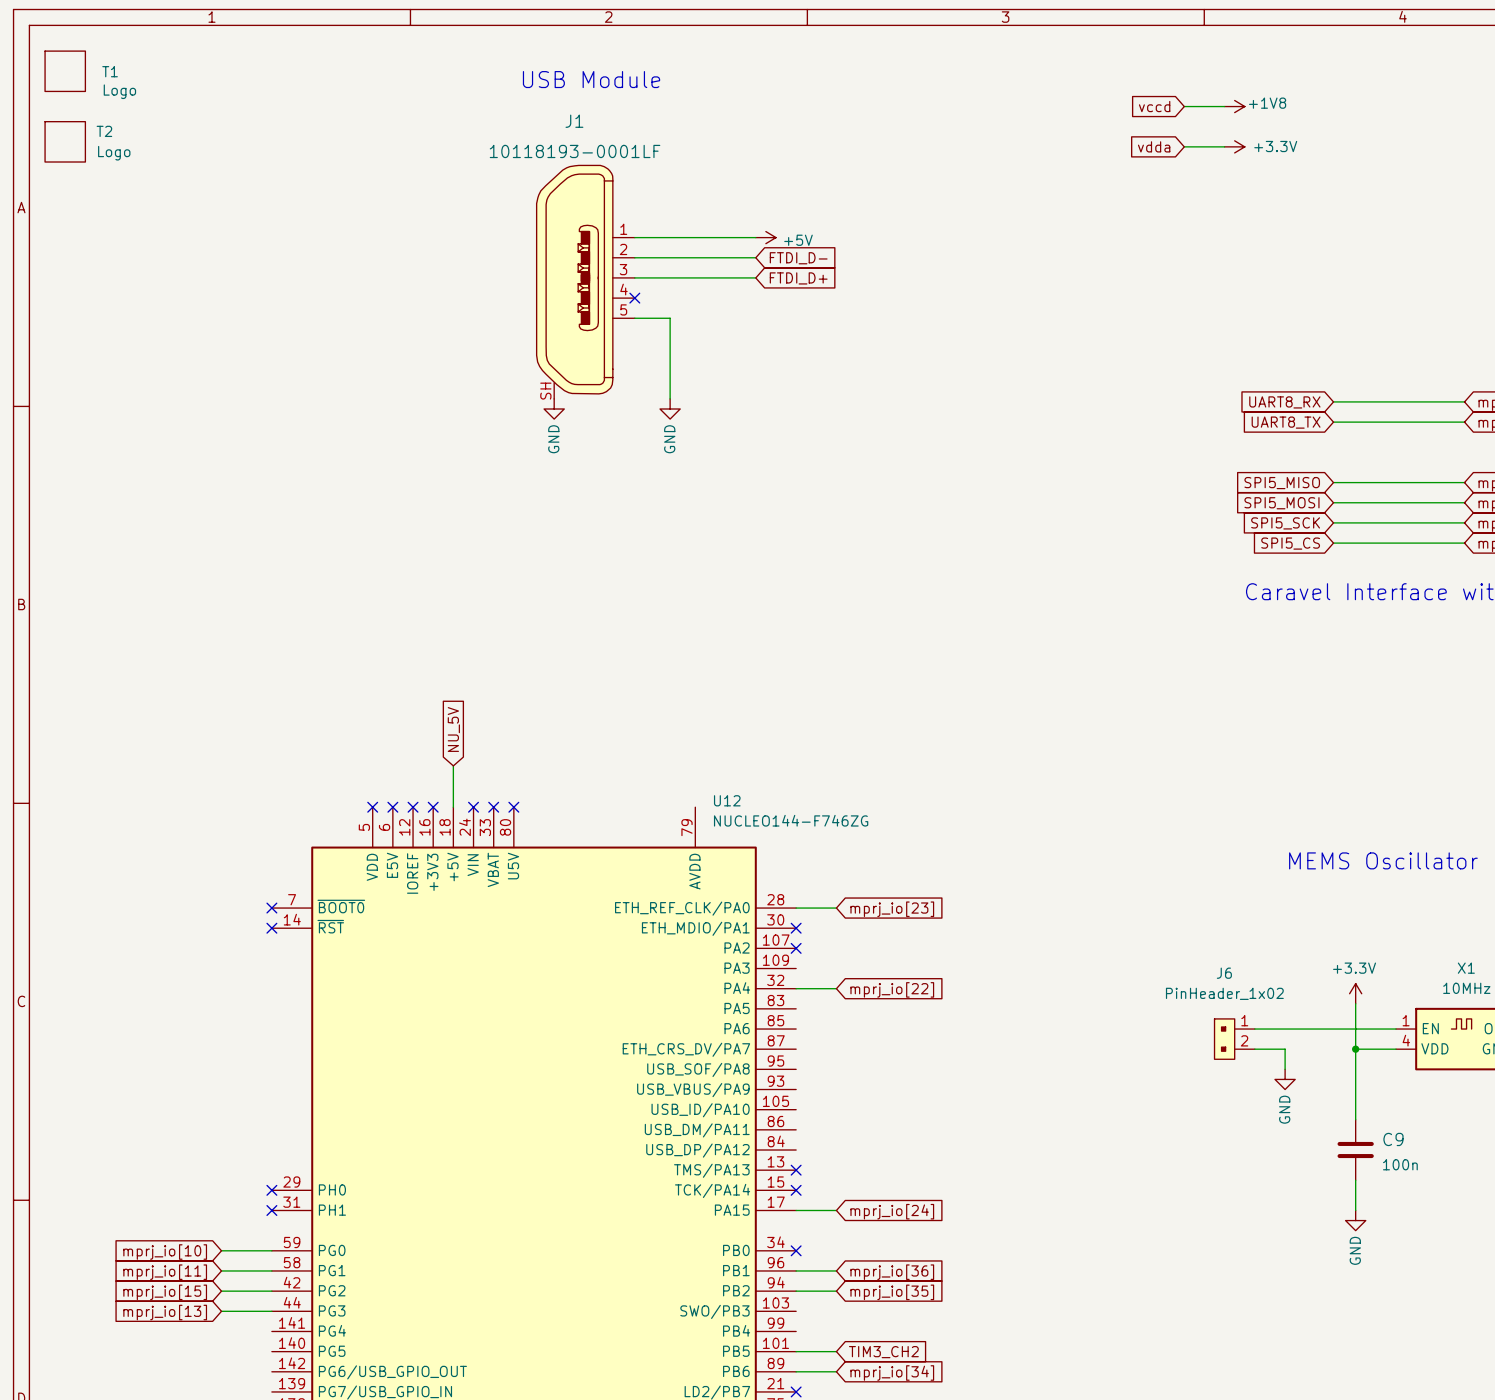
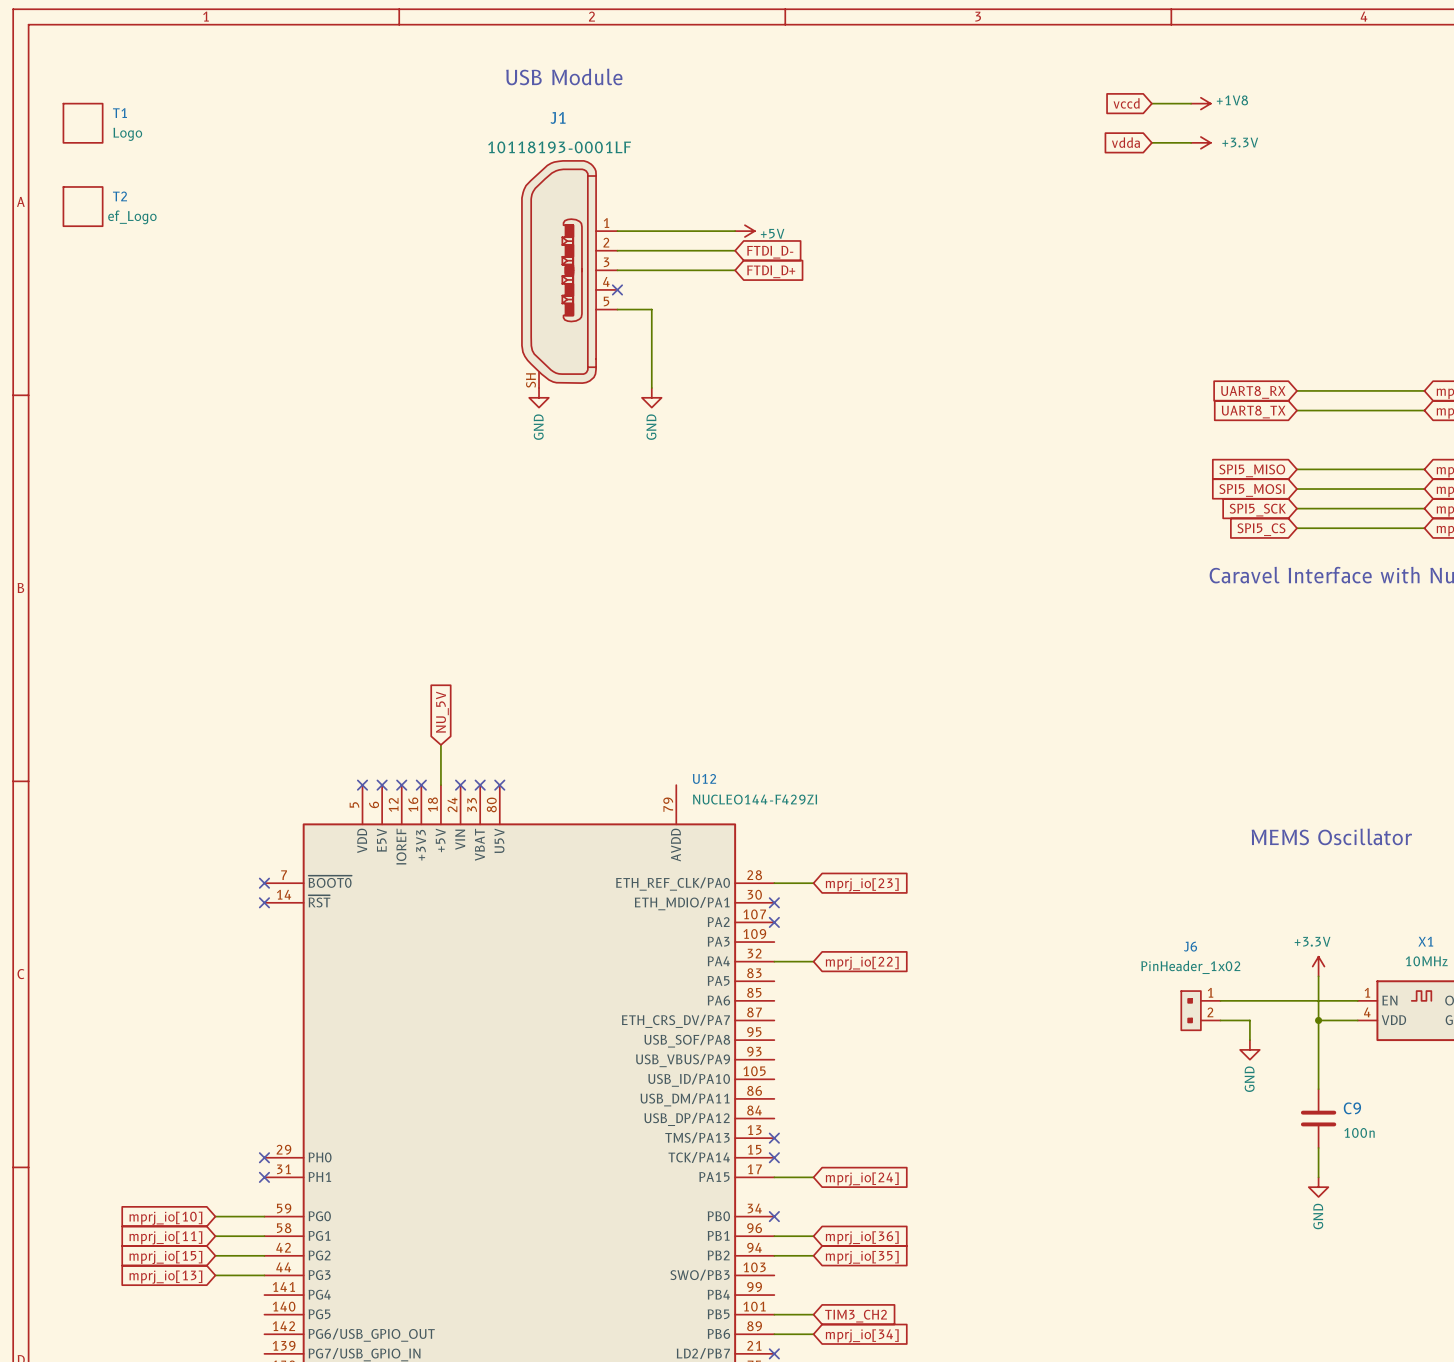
T1 position: (65, 71) -> (83, 123)
T1 name position: T1 (110, 71) -> T1 (119, 113)
T1 value position: Logo (119, 91) -> Logo (127, 134)
T2 position: (65, 141) -> (83, 206)
T2 value: Logo (114, 153) -> ef_Logo (132, 217)
U12 value: NUCLEO144-F746ZG (791, 820) -> NUCLEO144-F429ZI (755, 799)

